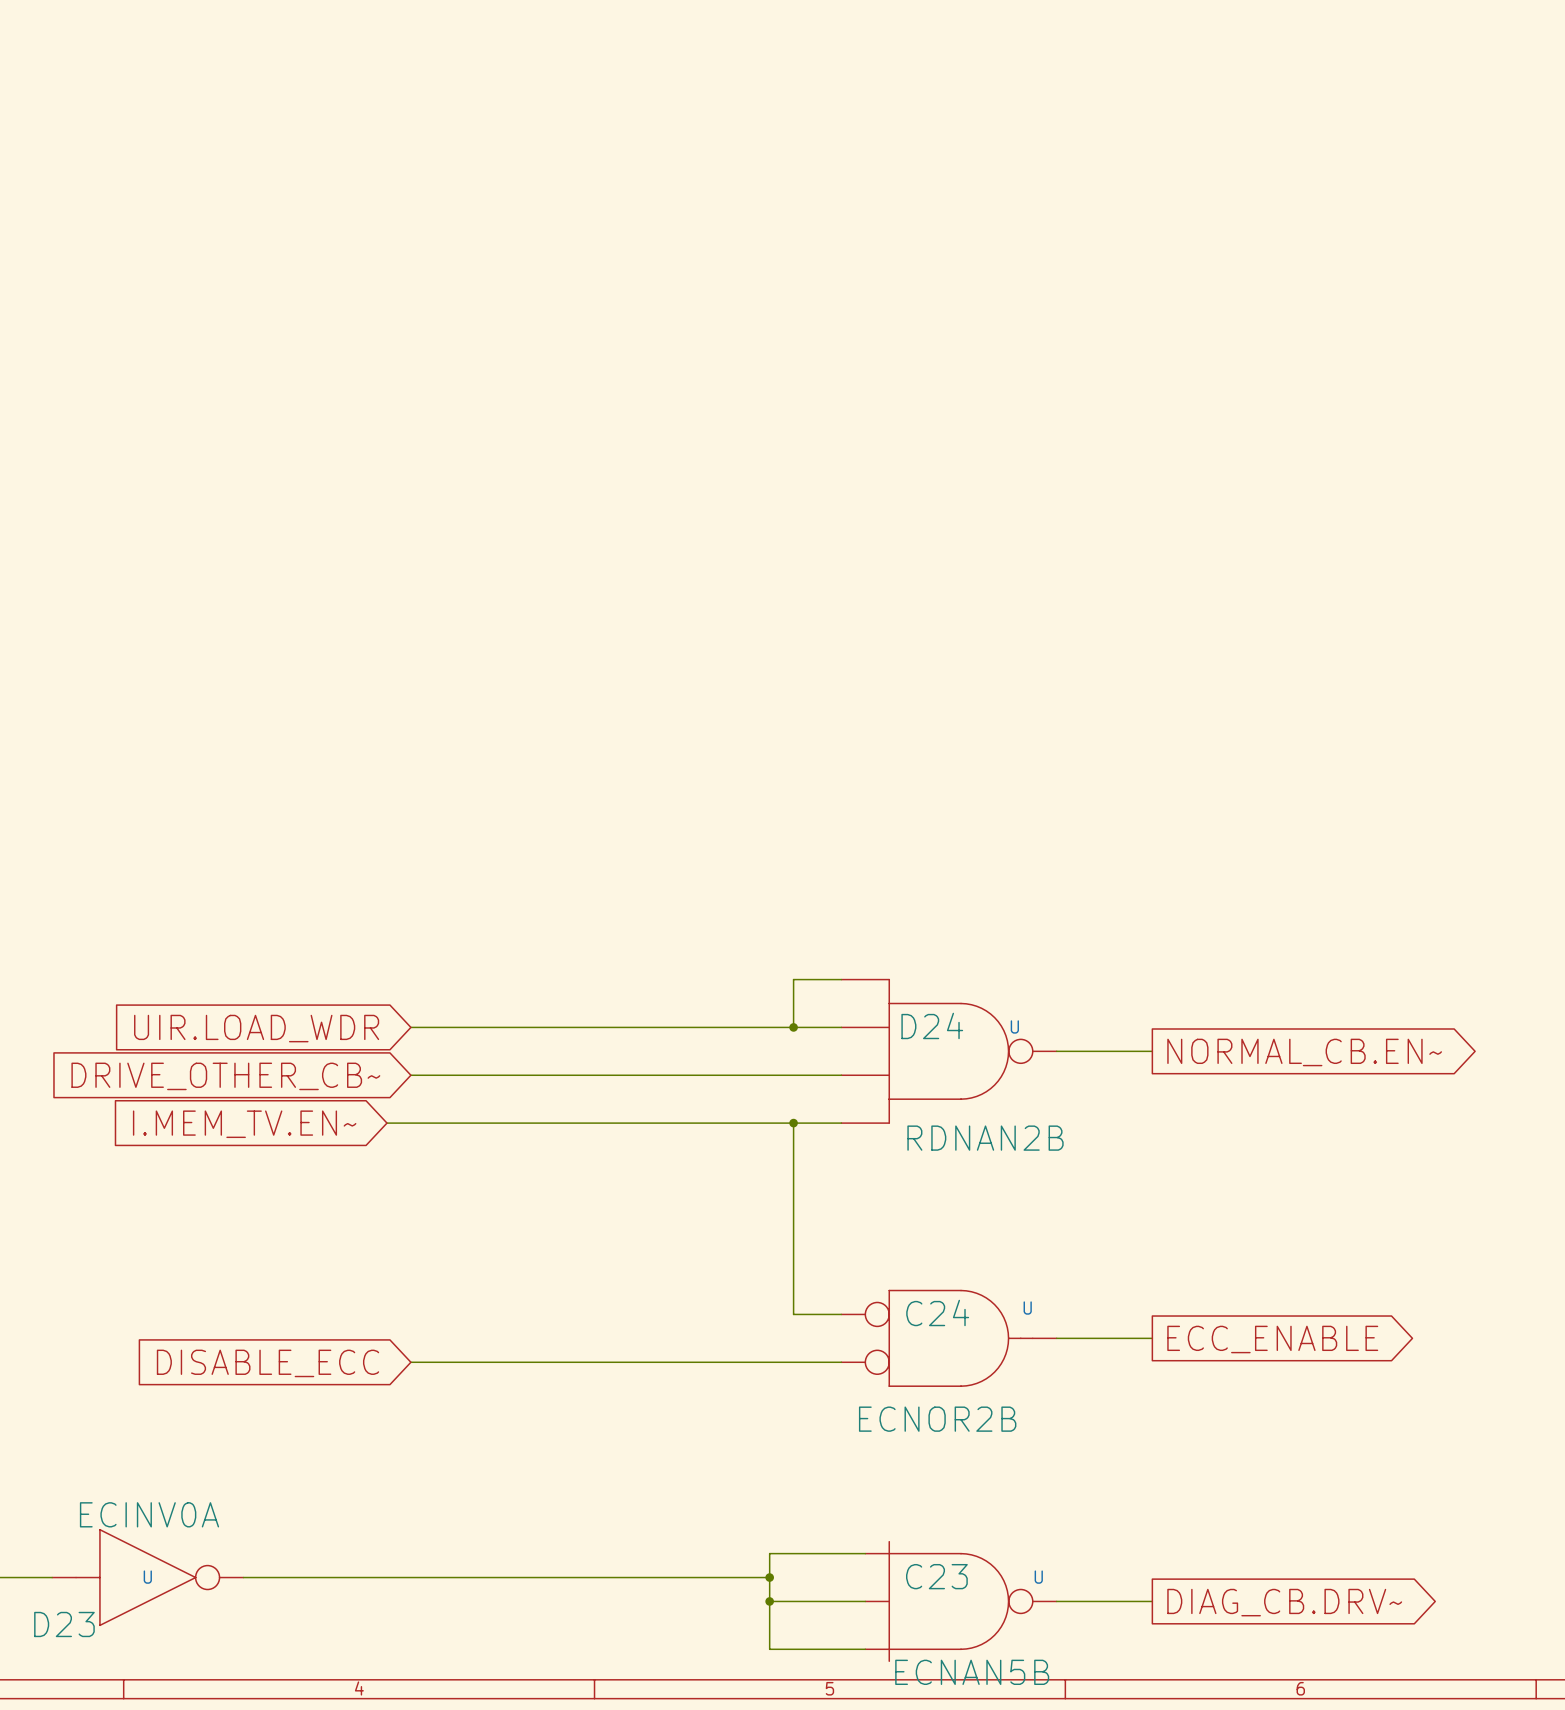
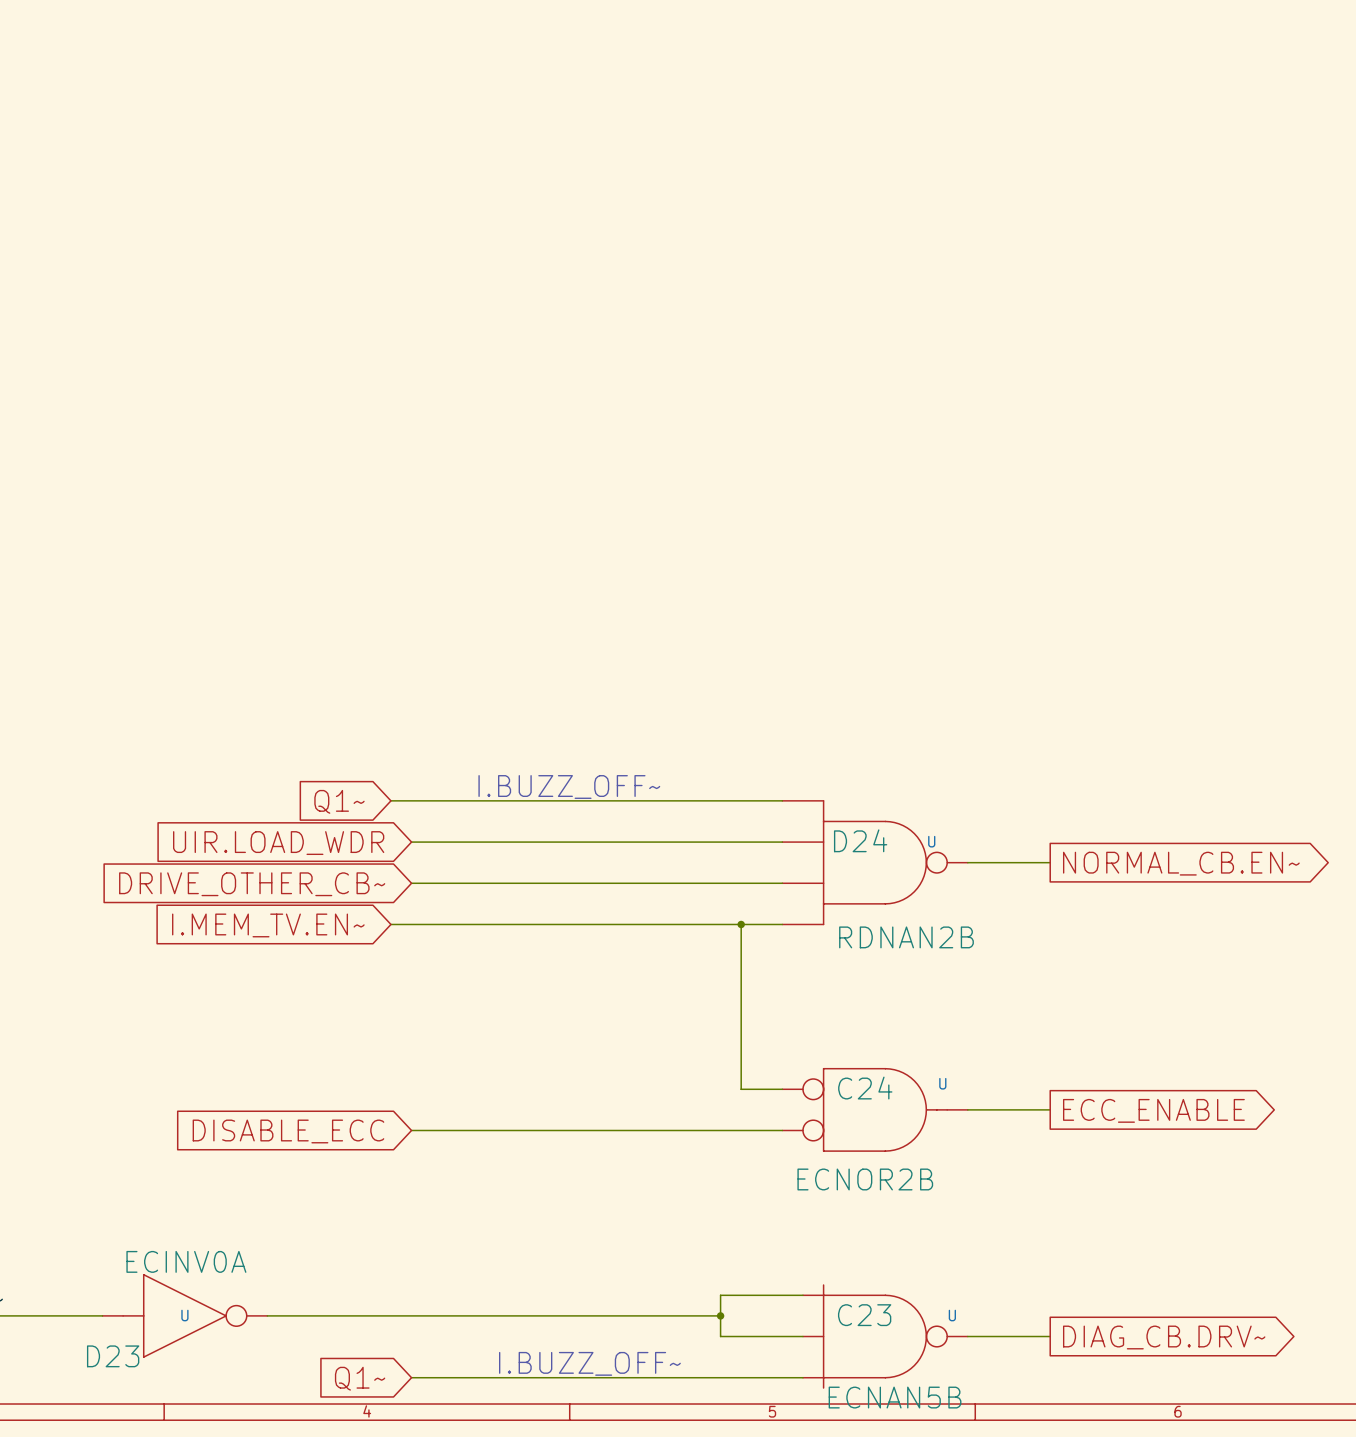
text: none -> I.BUZZ_OFF~ (569, 786)
wire: (793, 979) (793, 1027) -> (741, 800) (390, 800)
global label: none -> Q1~ (339, 801)
junction: (793, 1027) -> none
wire: (769, 1601) (769, 1649) -> (411, 1377) (720, 1377)
junction: (769, 1601) -> none
text: none -> I.BUZZ_OFF~ (589, 1363)
global label: none -> Q1~ (360, 1378)

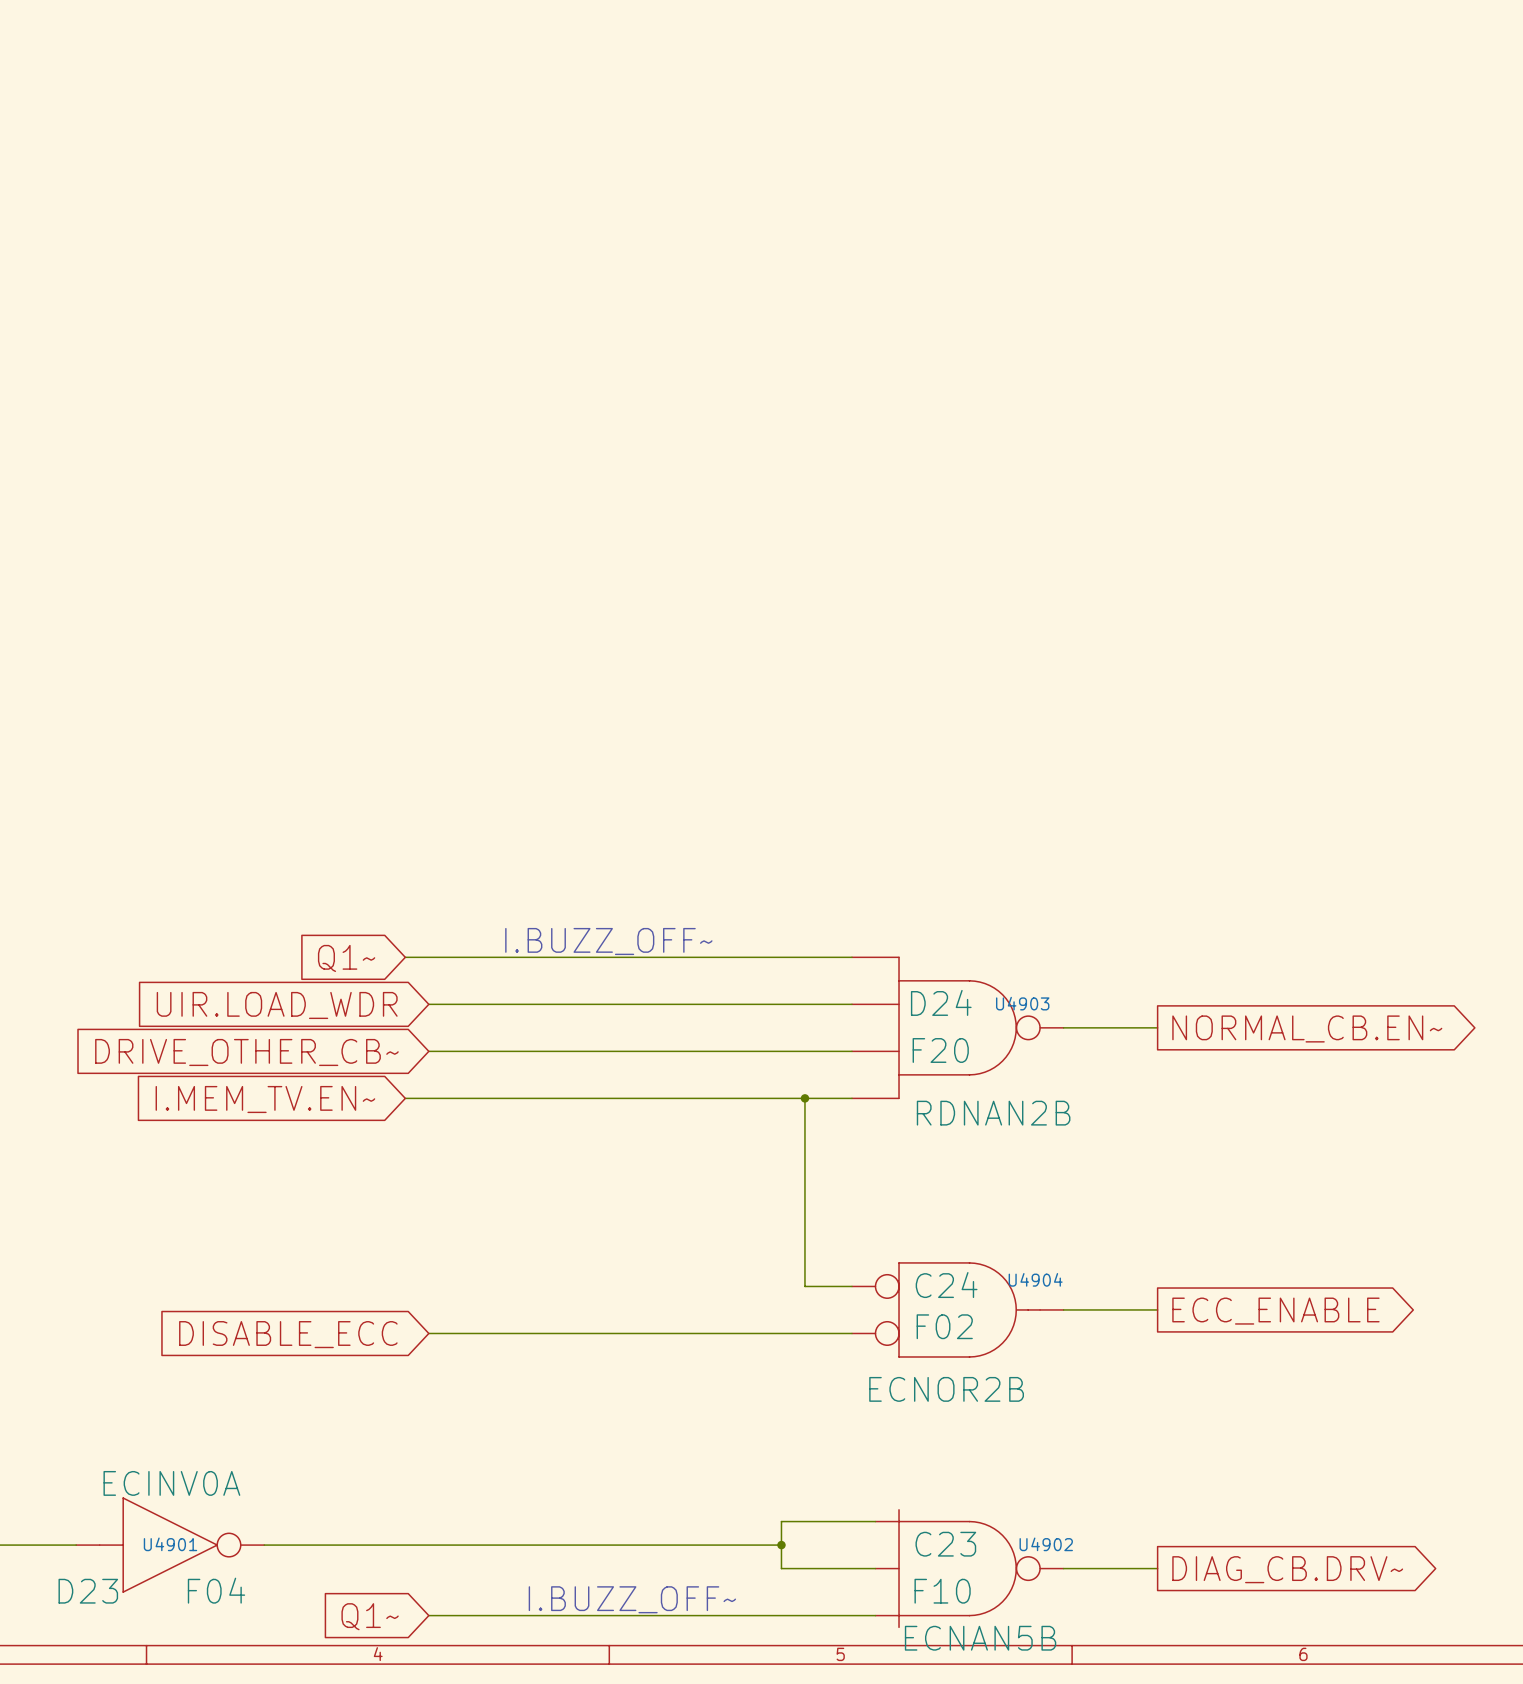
U name: U (931, 841) -> U4903 (1022, 1003)
U value: none -> F20 (940, 1050)
U name: U (942, 1083) -> U4904 (1035, 1279)
U value: none -> F02 (944, 1326)
U name: U (184, 1315) -> U4901 (170, 1544)
U name: U (952, 1315) -> U4902 (1046, 1544)
U value: none -> F04 (216, 1590)
U value: none -> F10 (942, 1591)

